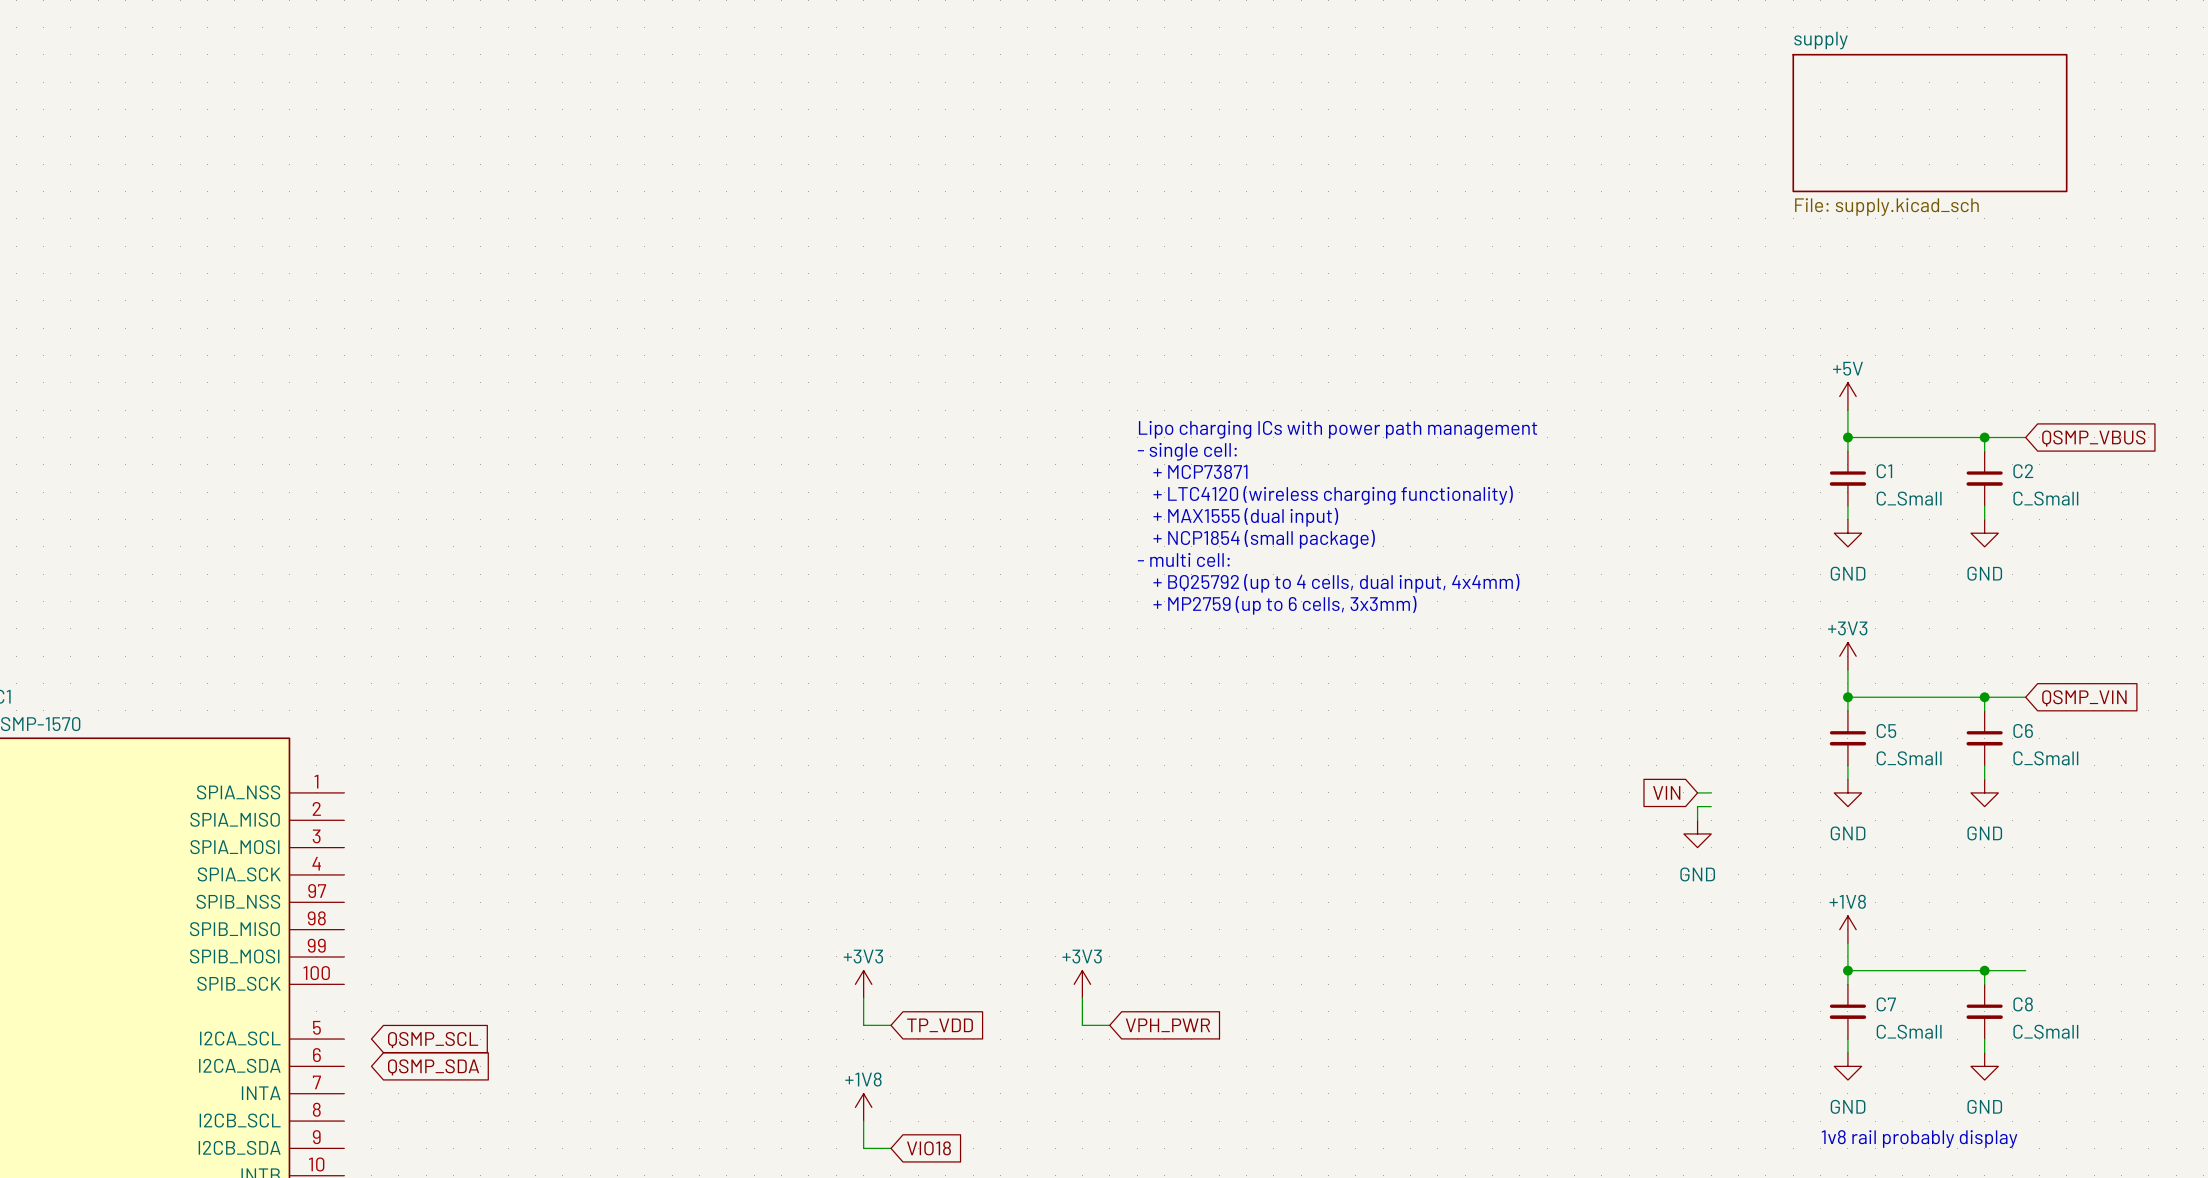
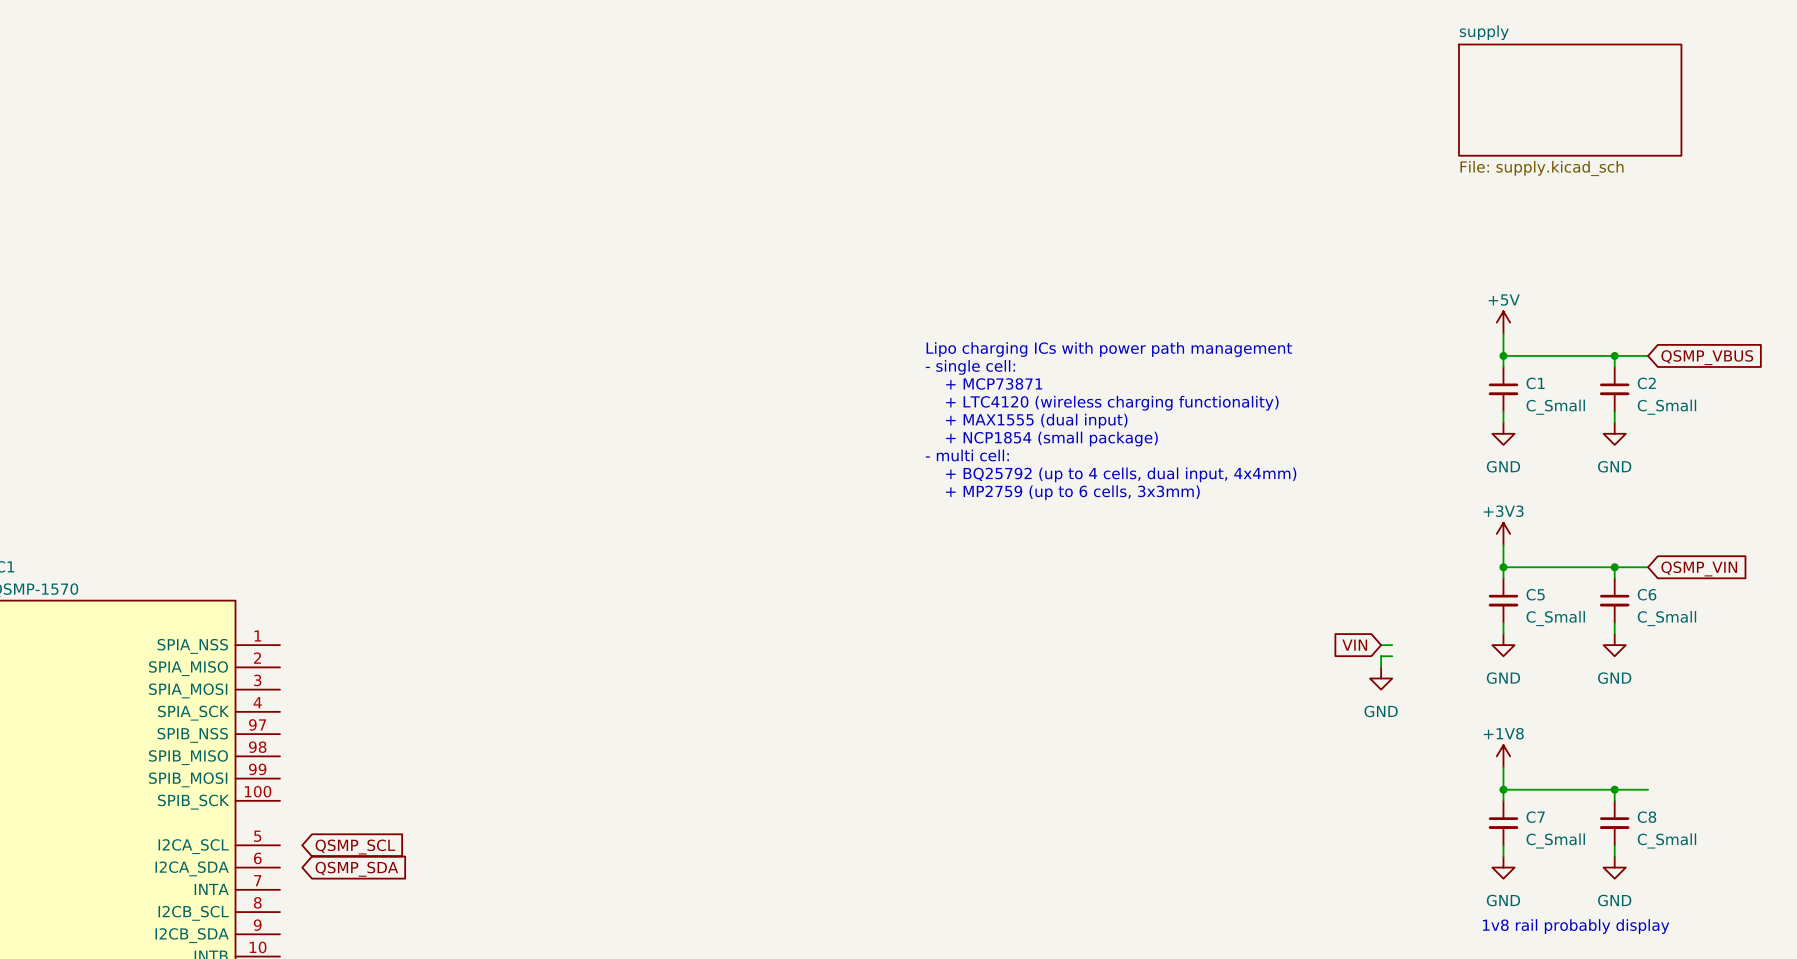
power symbol: +3V3 (863, 984) -> none
power symbol: +3V3 (1082, 984) -> none
wire: (863, 998) (863, 1025) (890, 1025) -> none
wire: (1082, 998) (1082, 1025) (1109, 1025) -> none
global label: TP_VDD (940, 1025) -> none
global label: VPH_PWR (1167, 1025) -> none
power symbol: +1V8 (863, 1107) -> none
wire: (863, 1121) (863, 1148) (890, 1148) -> none
global label: VIO18 (928, 1148) -> none

